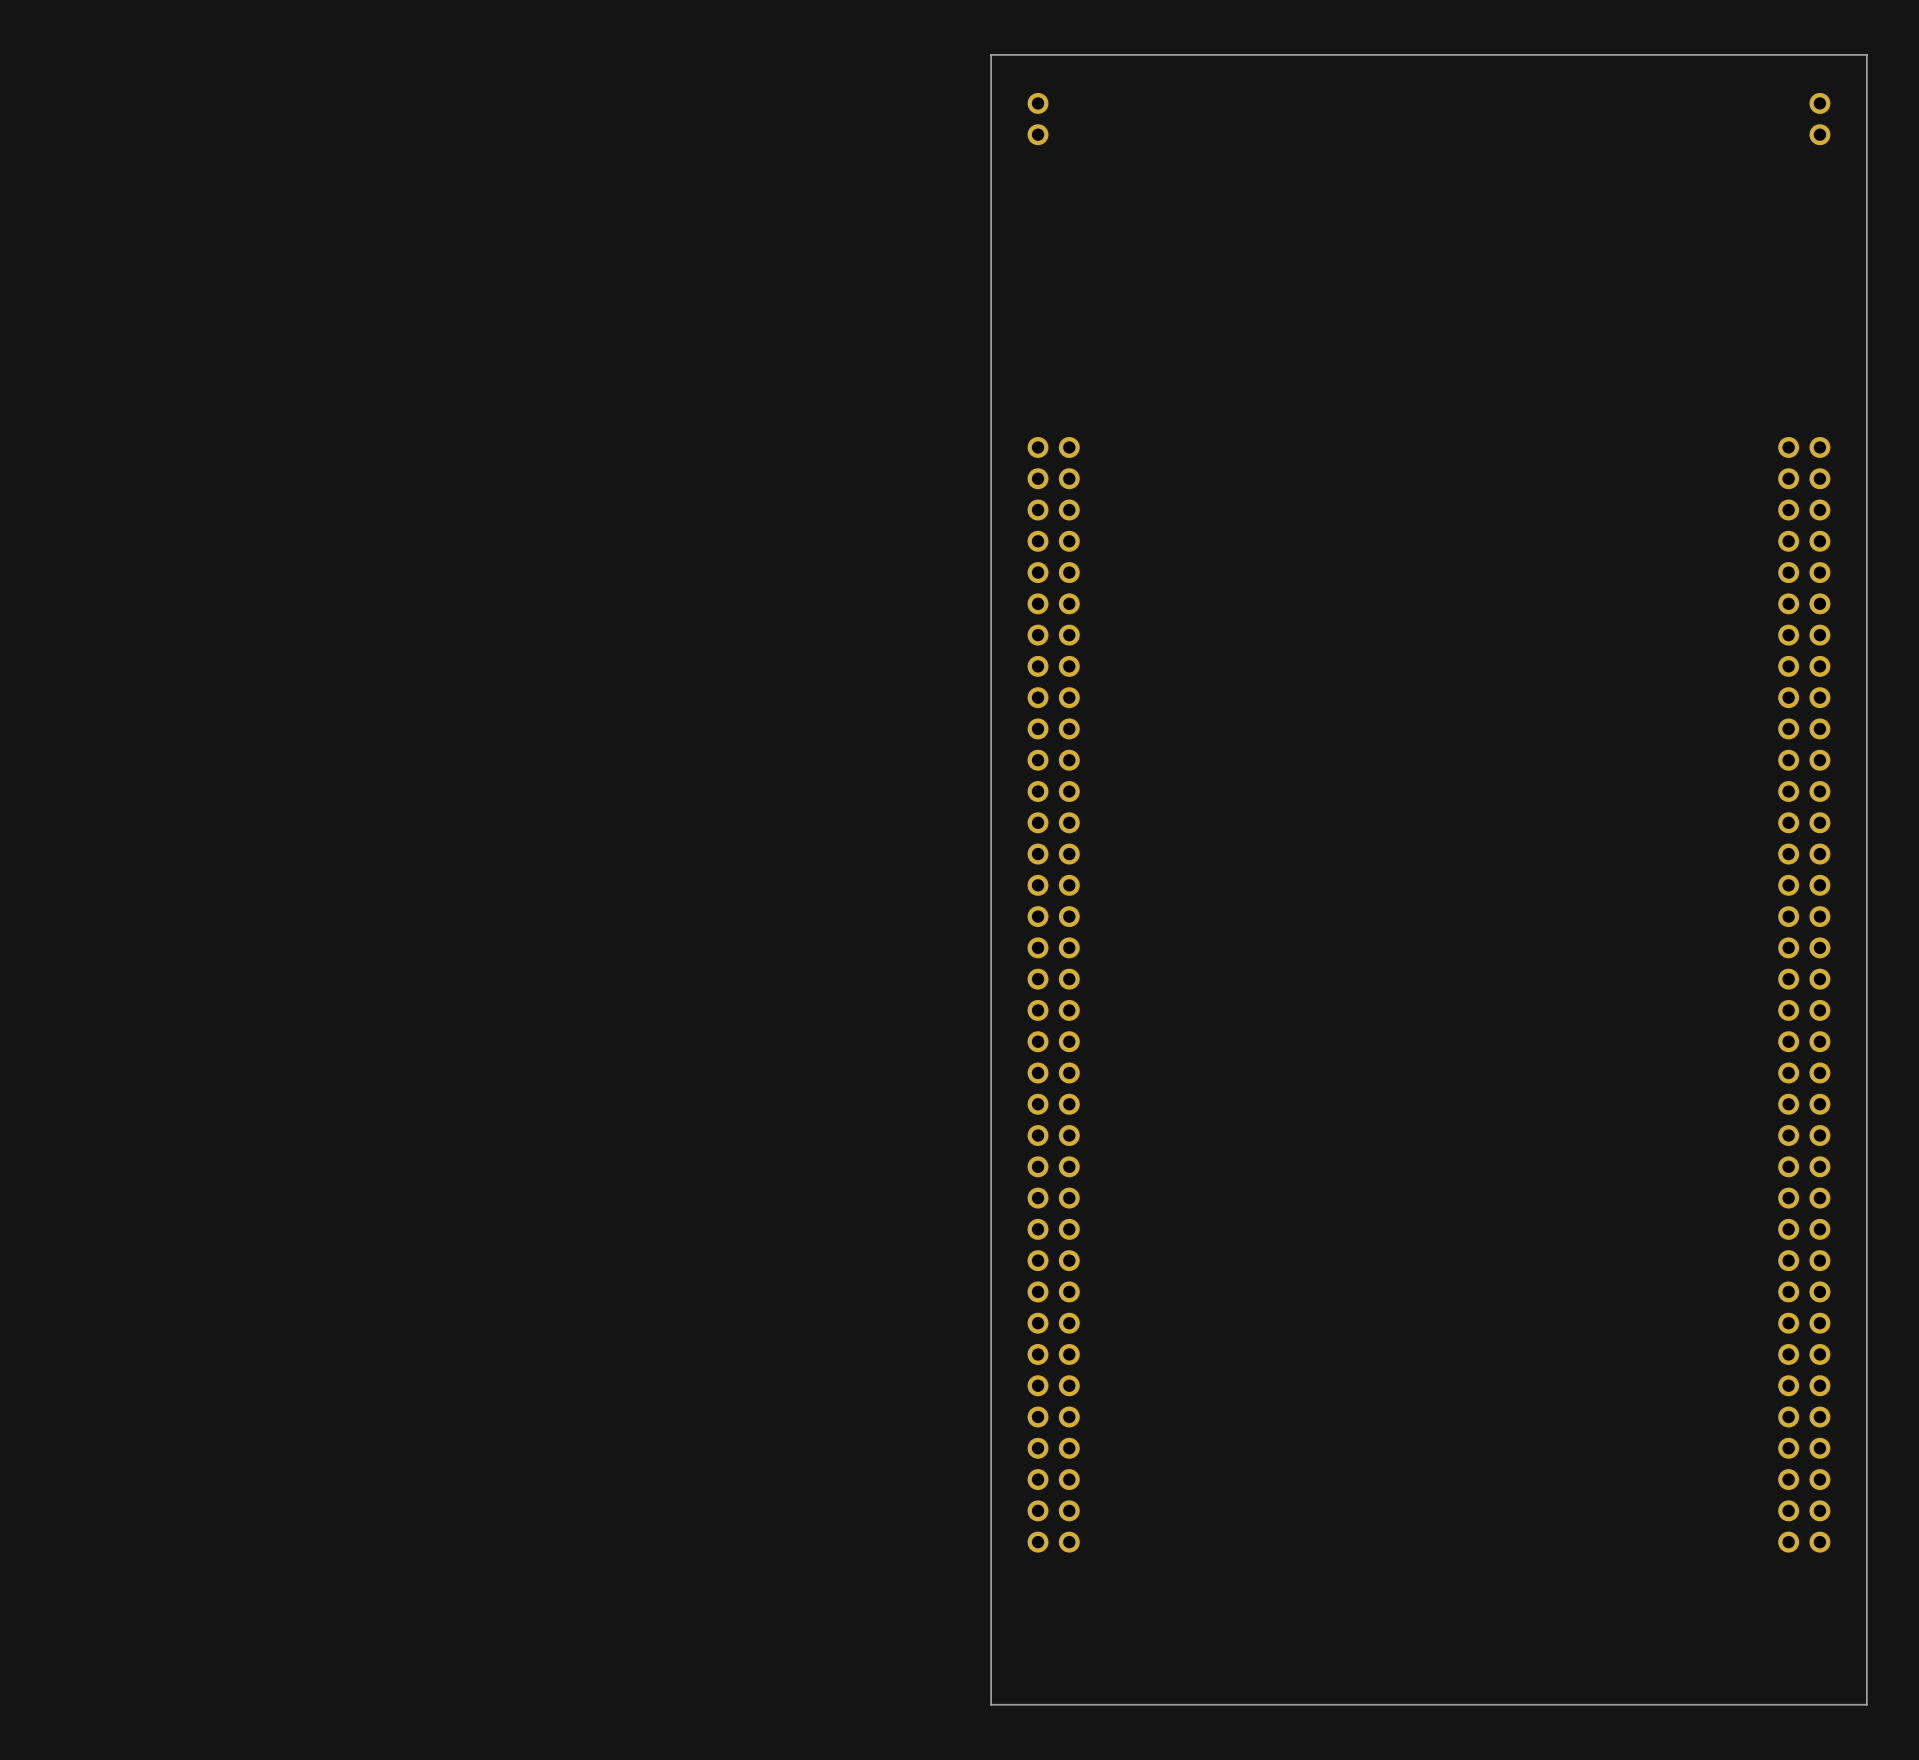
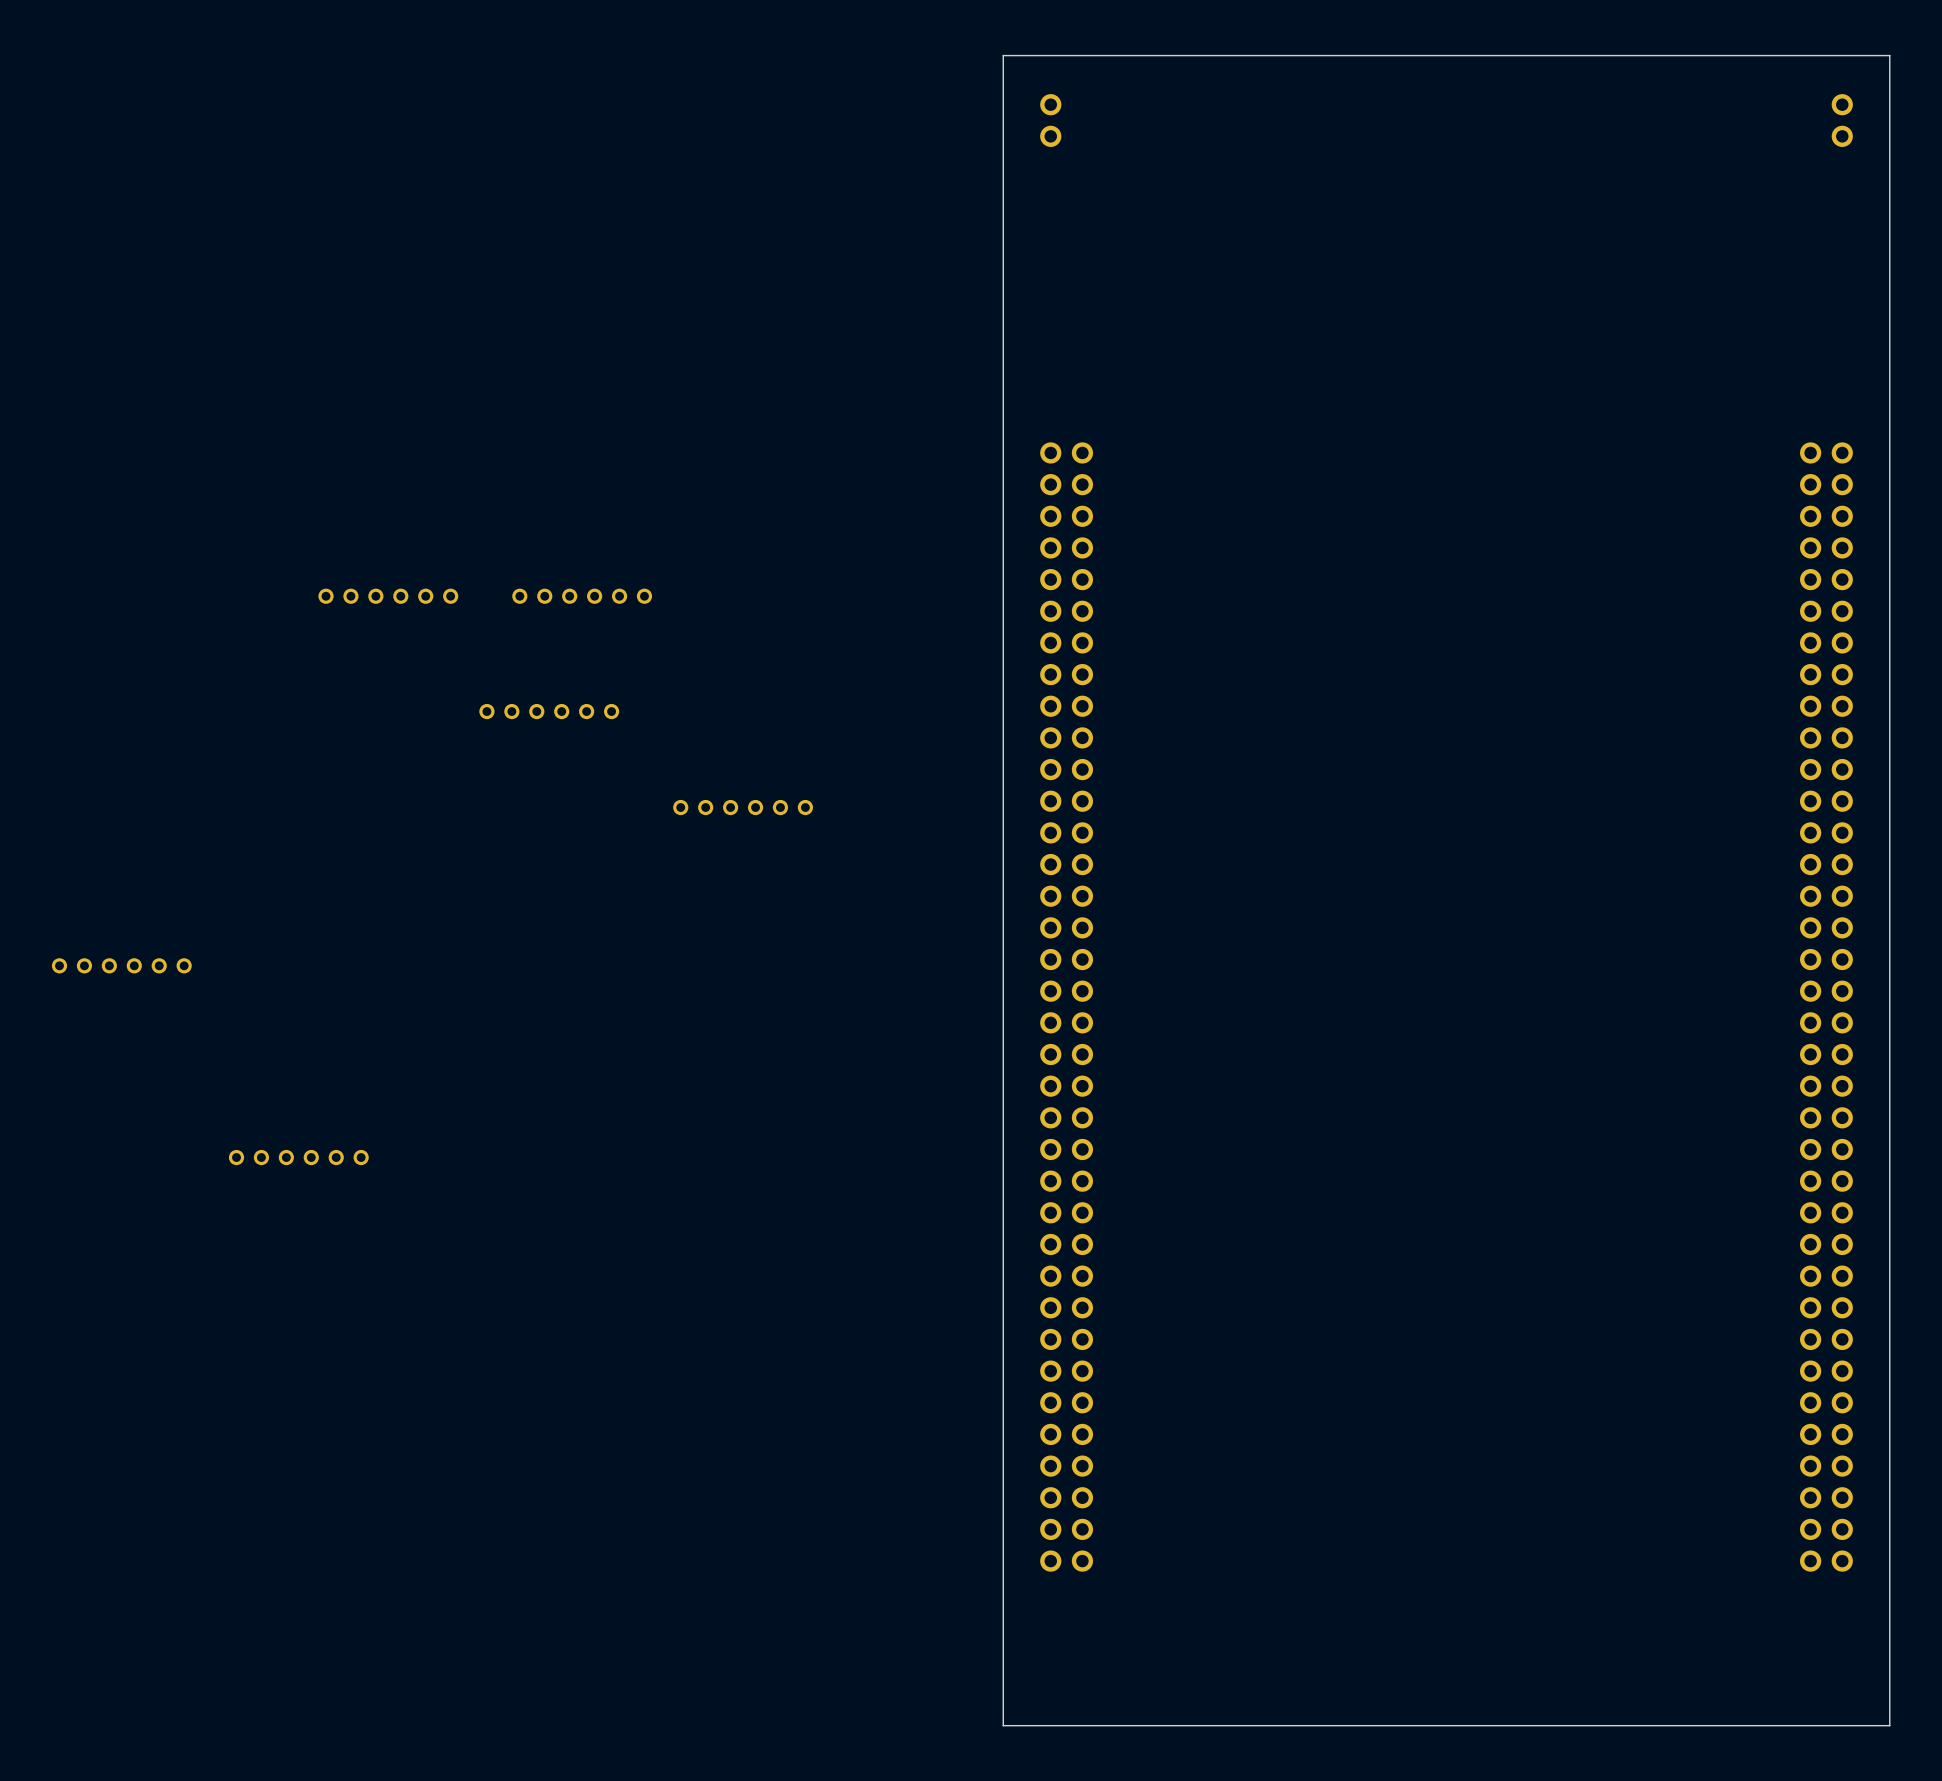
part: none -> (388, 596)
part: none -> (582, 596)
part: none -> (549, 711)
part: none -> (743, 807)
part: none -> (121, 965)
part: none -> (298, 1157)

